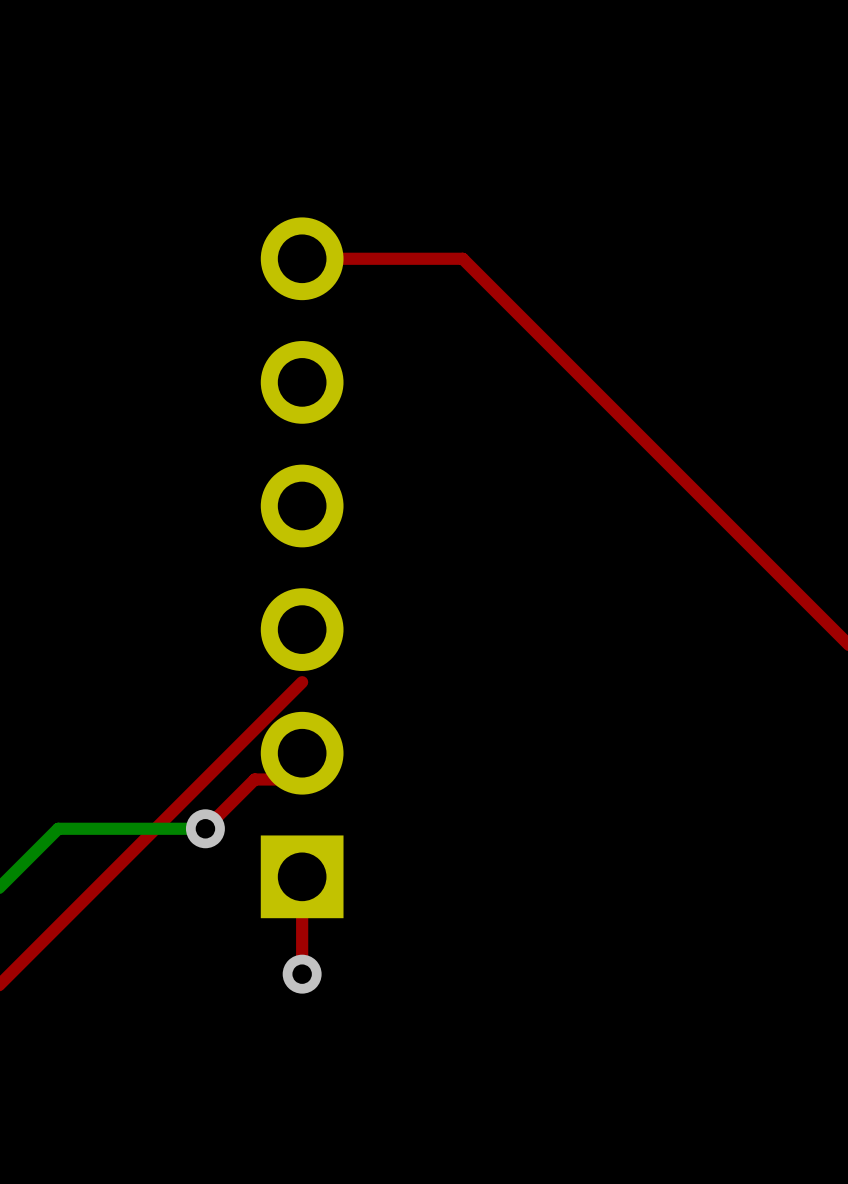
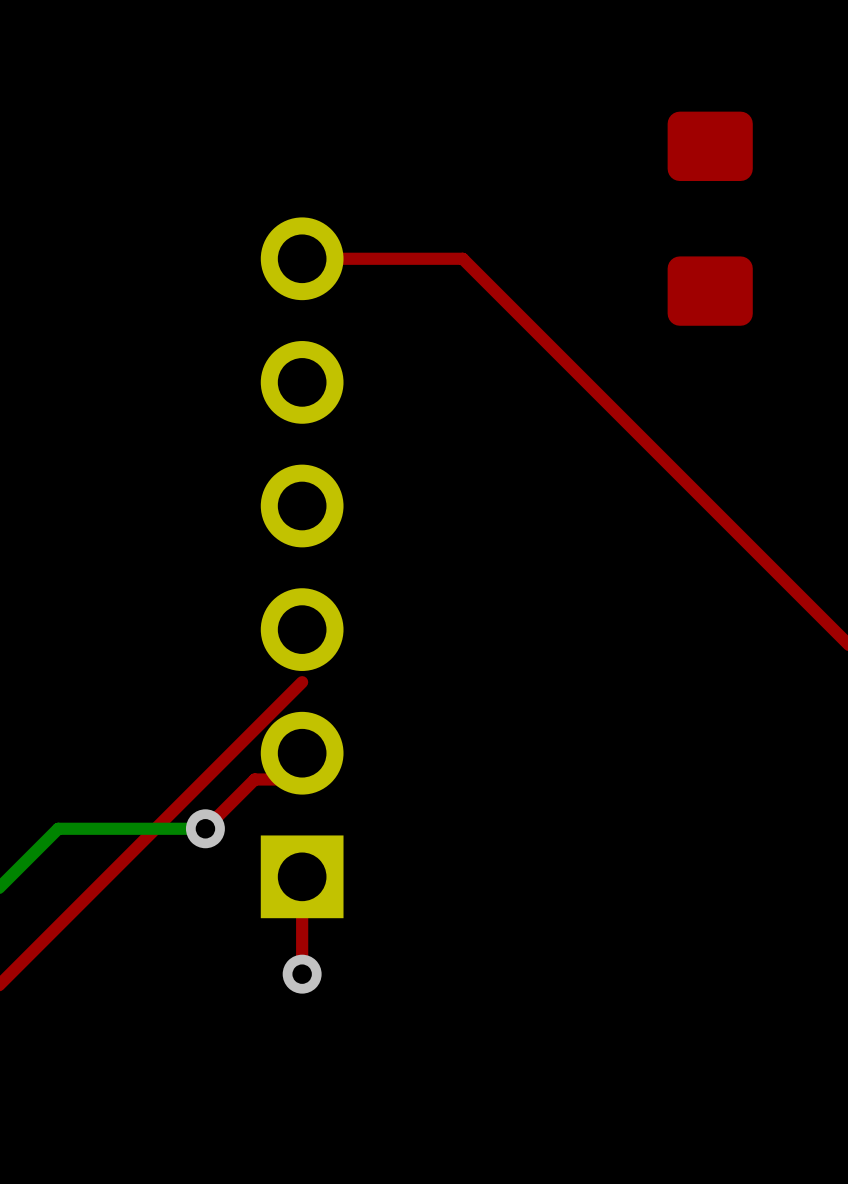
part: none -> (710, 218)

